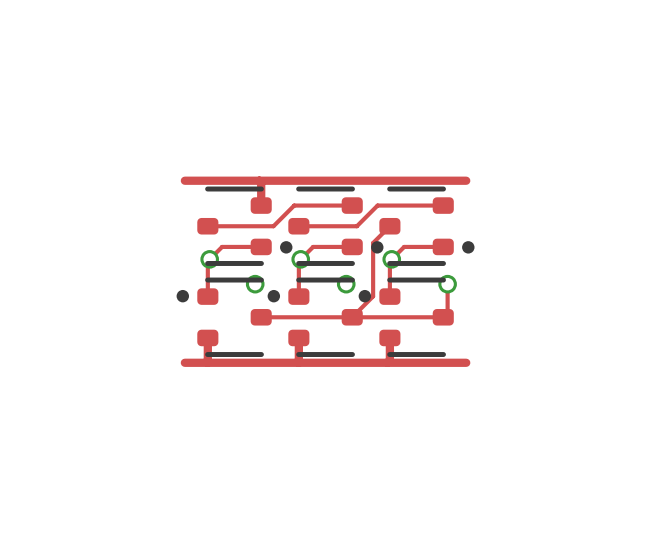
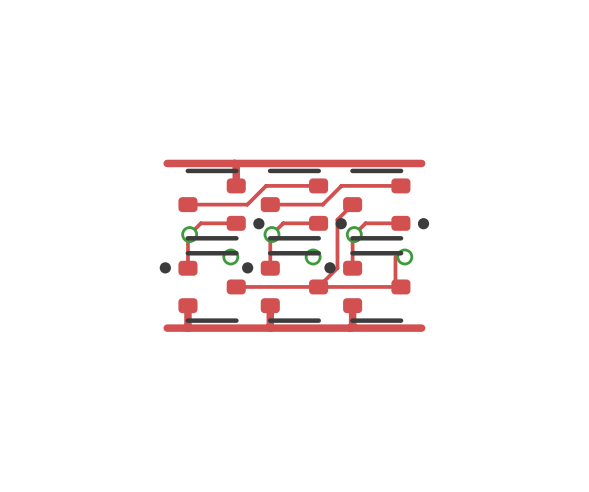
track: none -> (395, 257) (395, 281) (400, 286)
track: (447, 284) (447, 312) -> none

